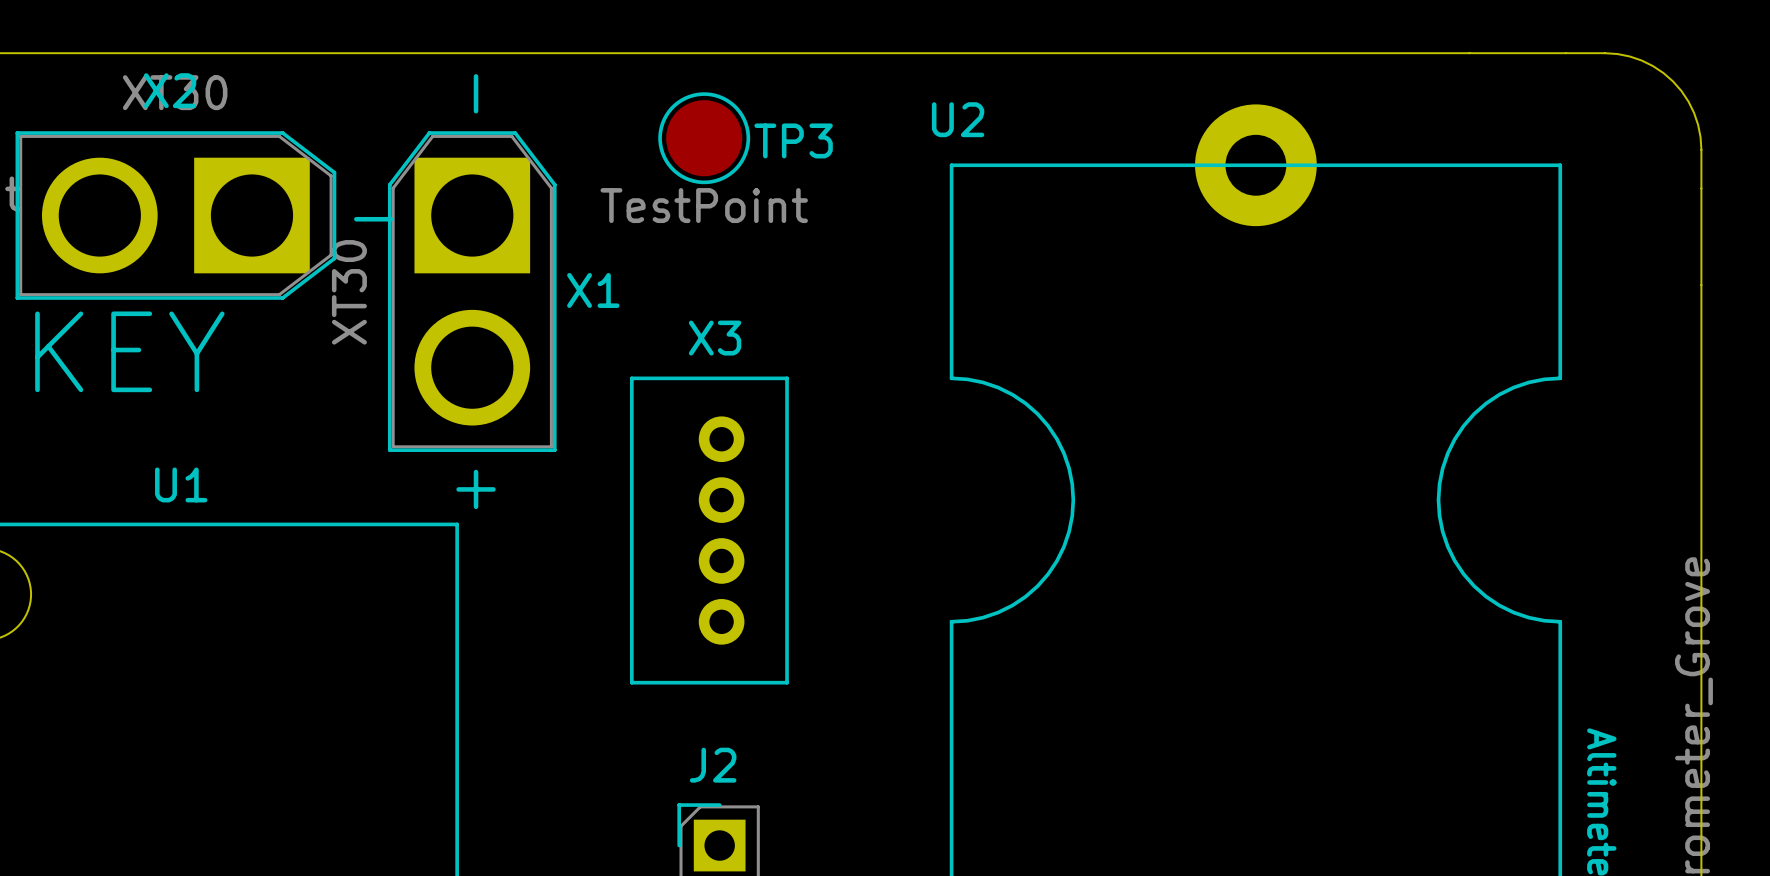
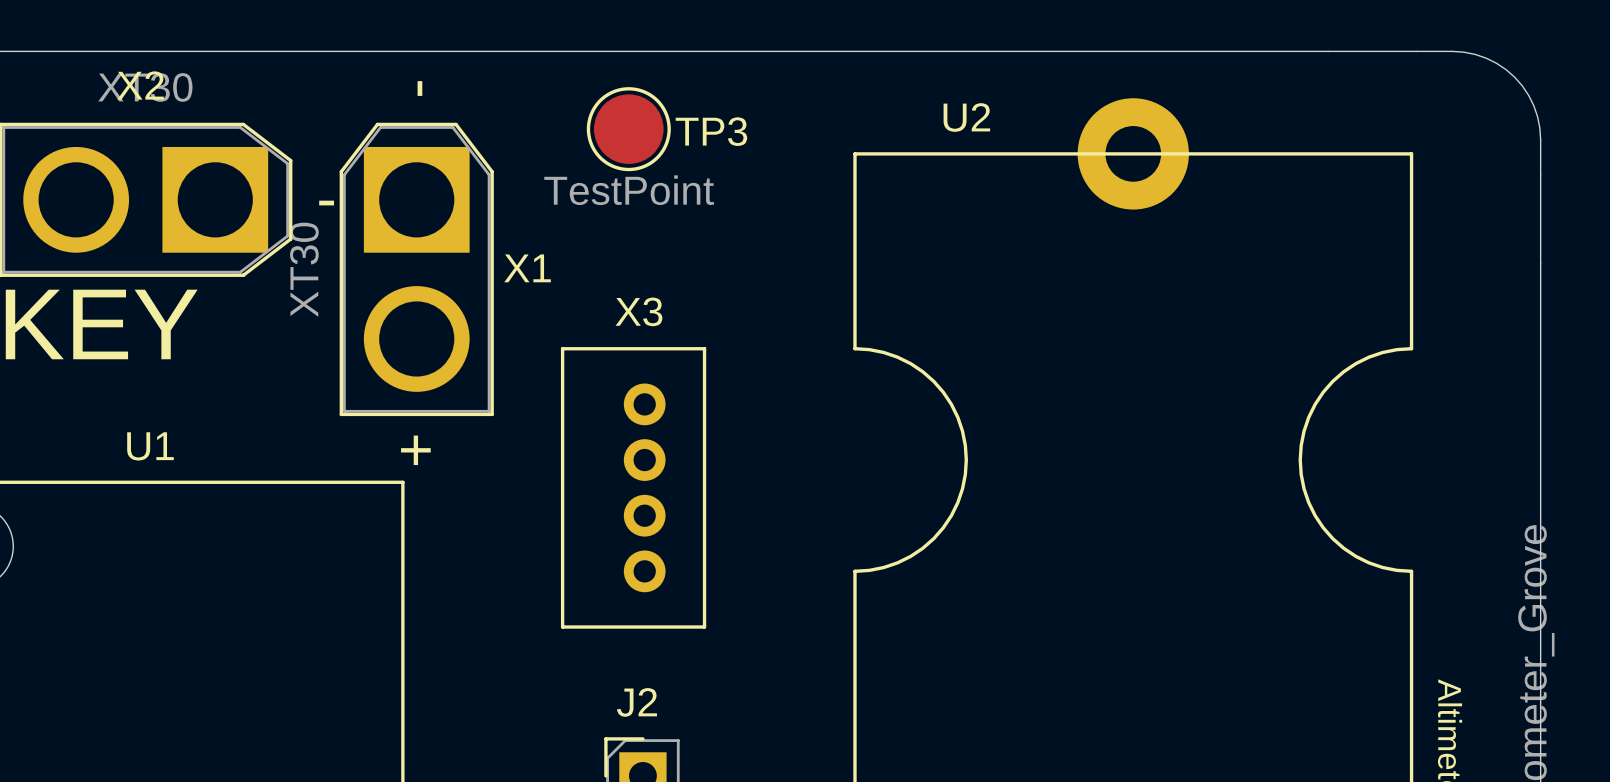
U2 name position: U2 (958, 119) -> U2 (966, 117)

